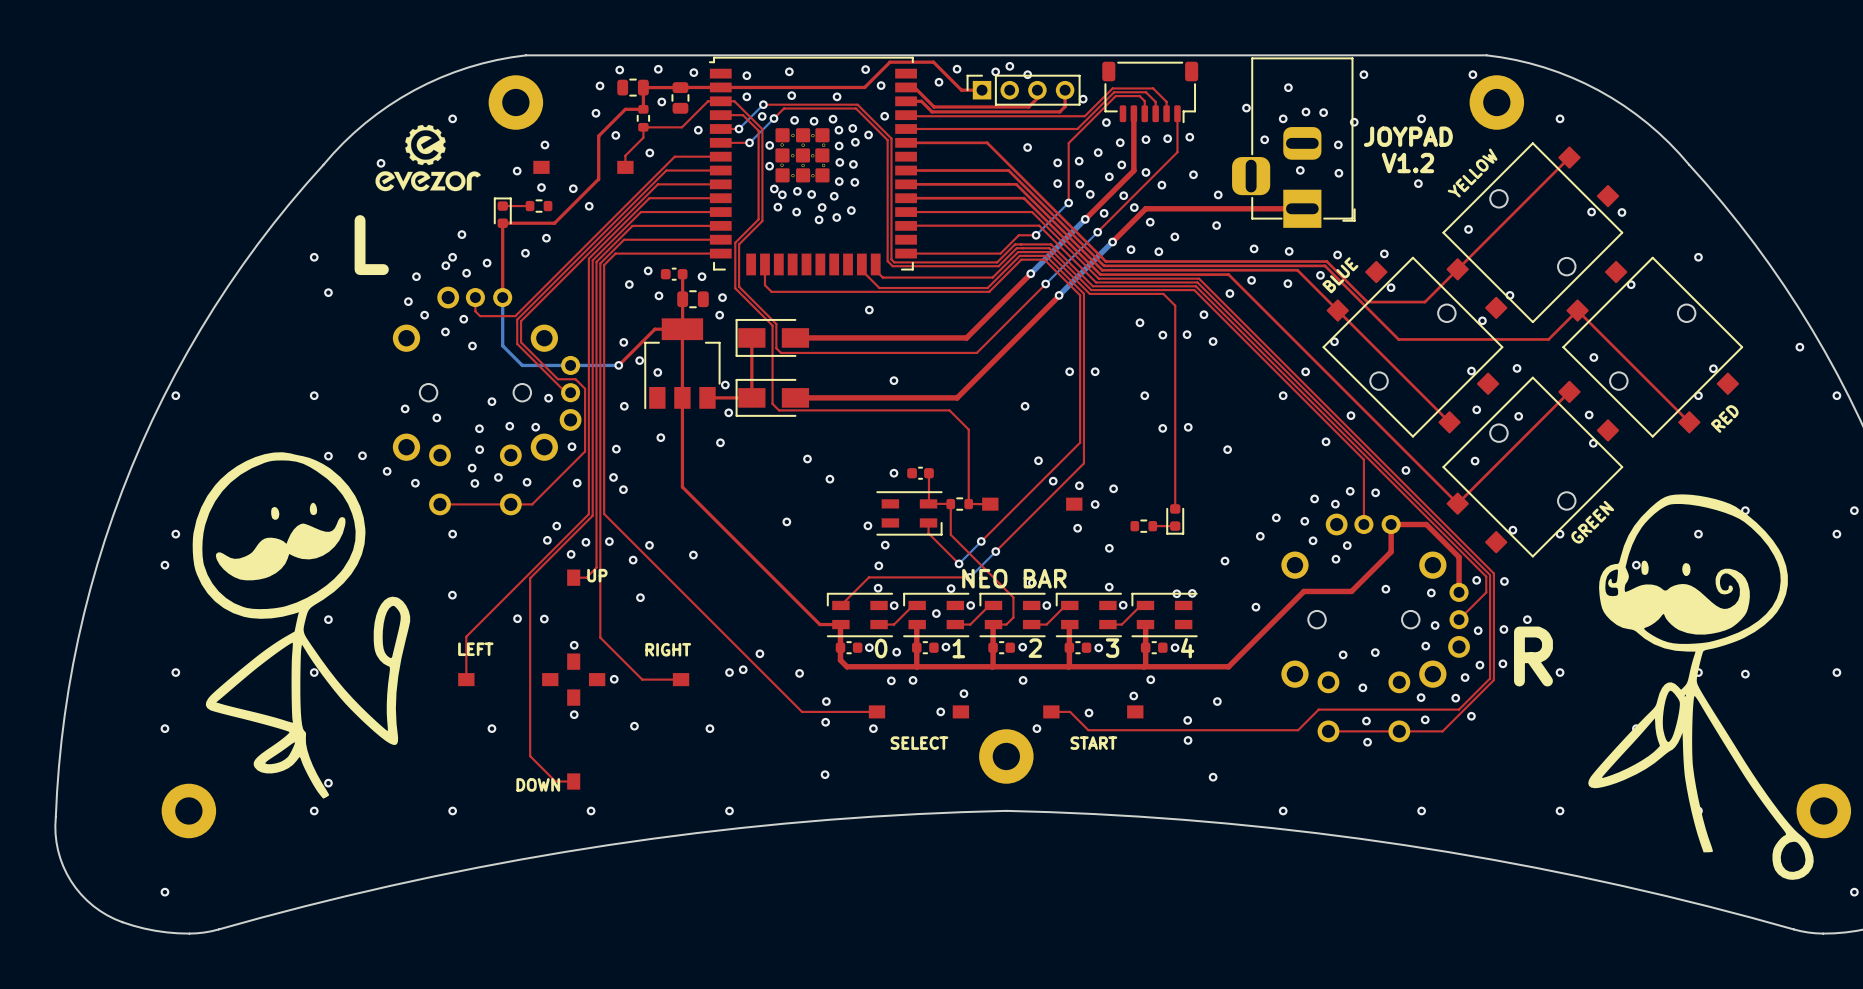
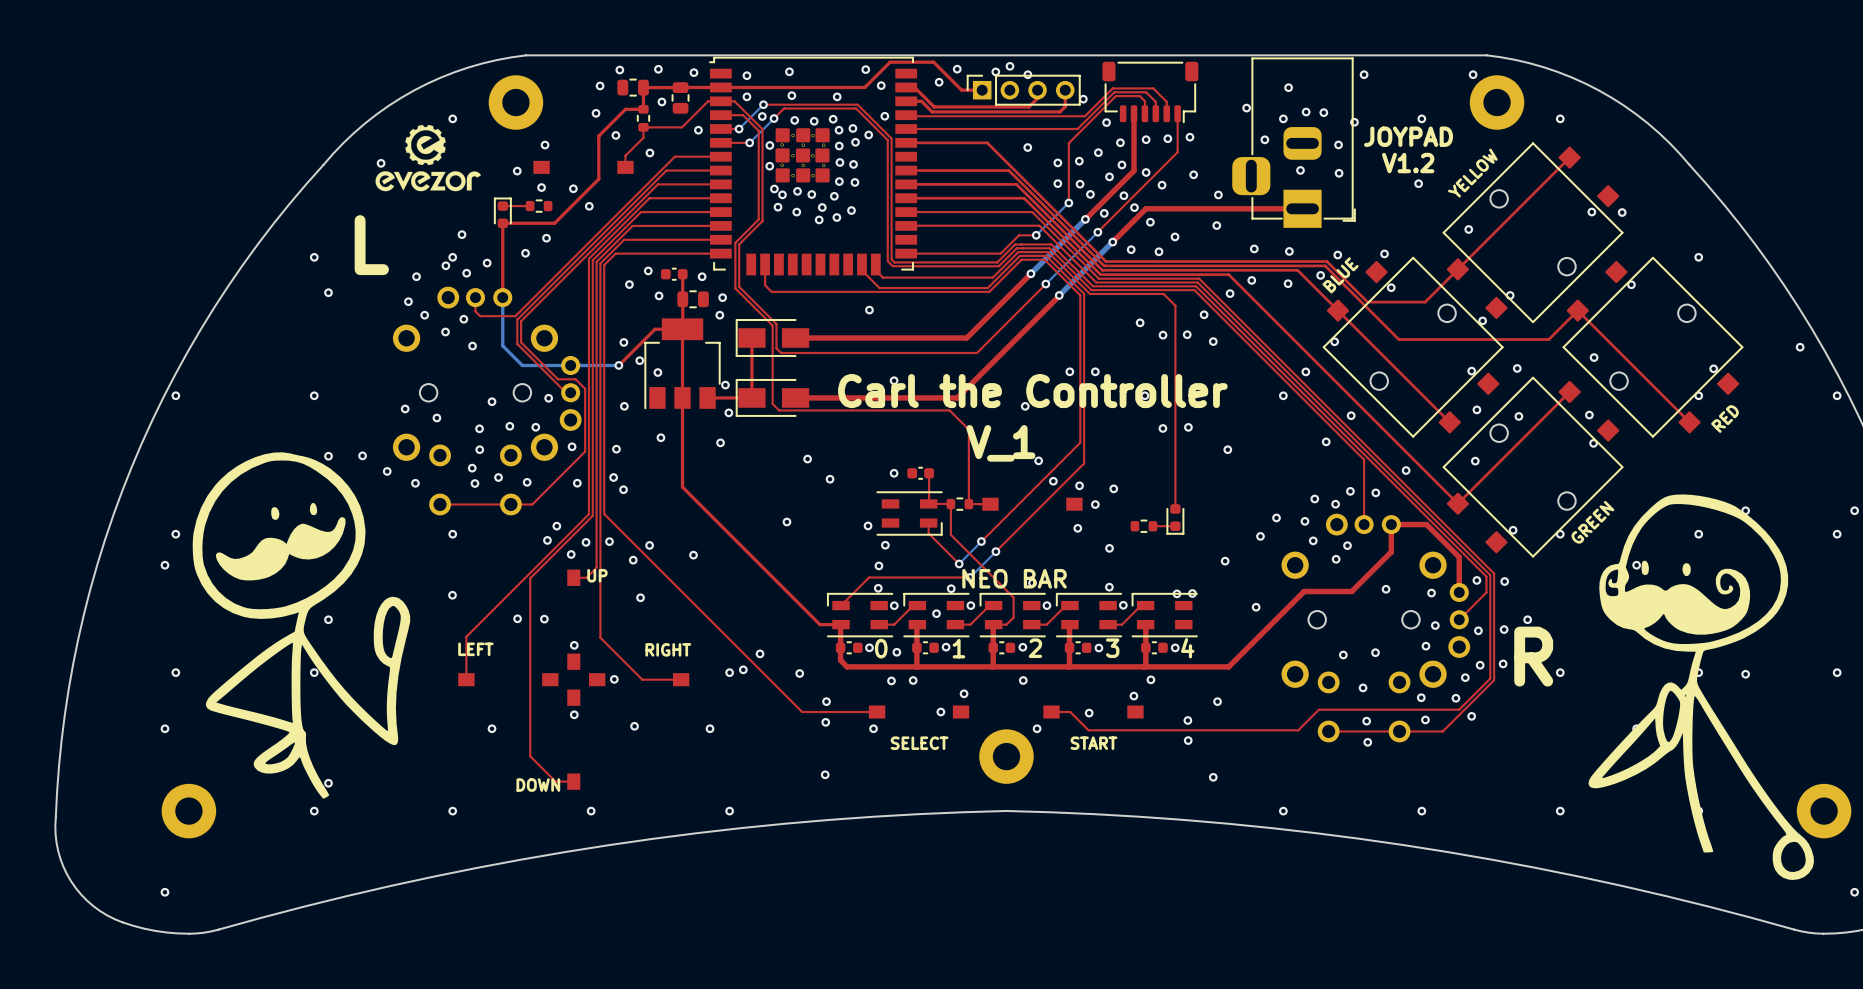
text: none -> Carl the Controller (1032, 391)
text: none -> V_1 (1000, 443)

